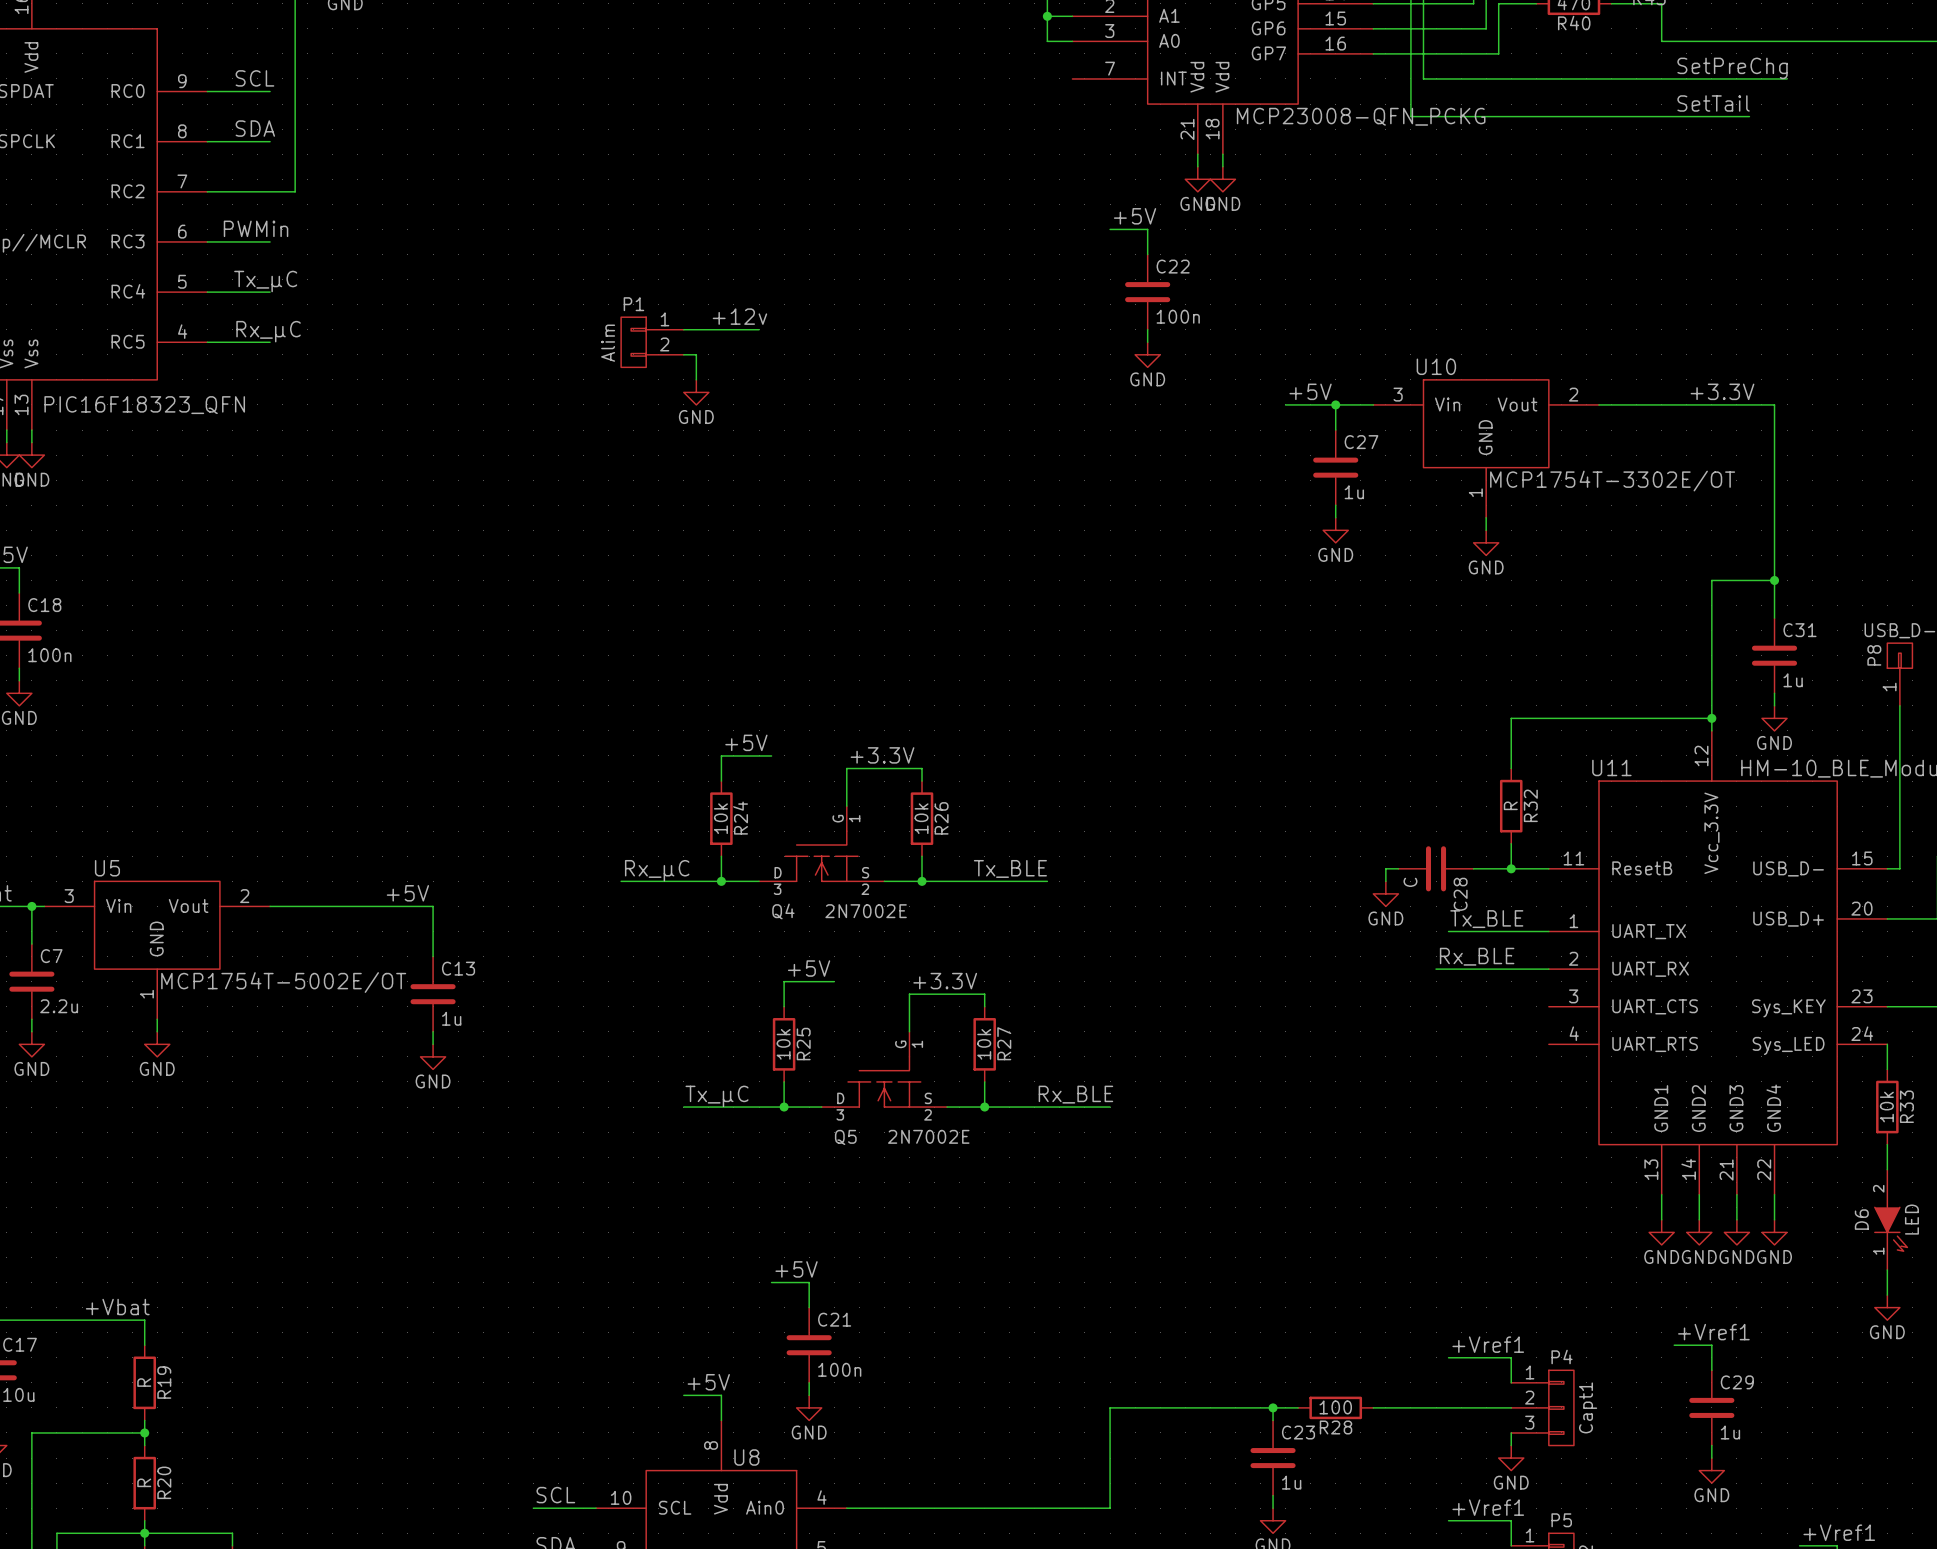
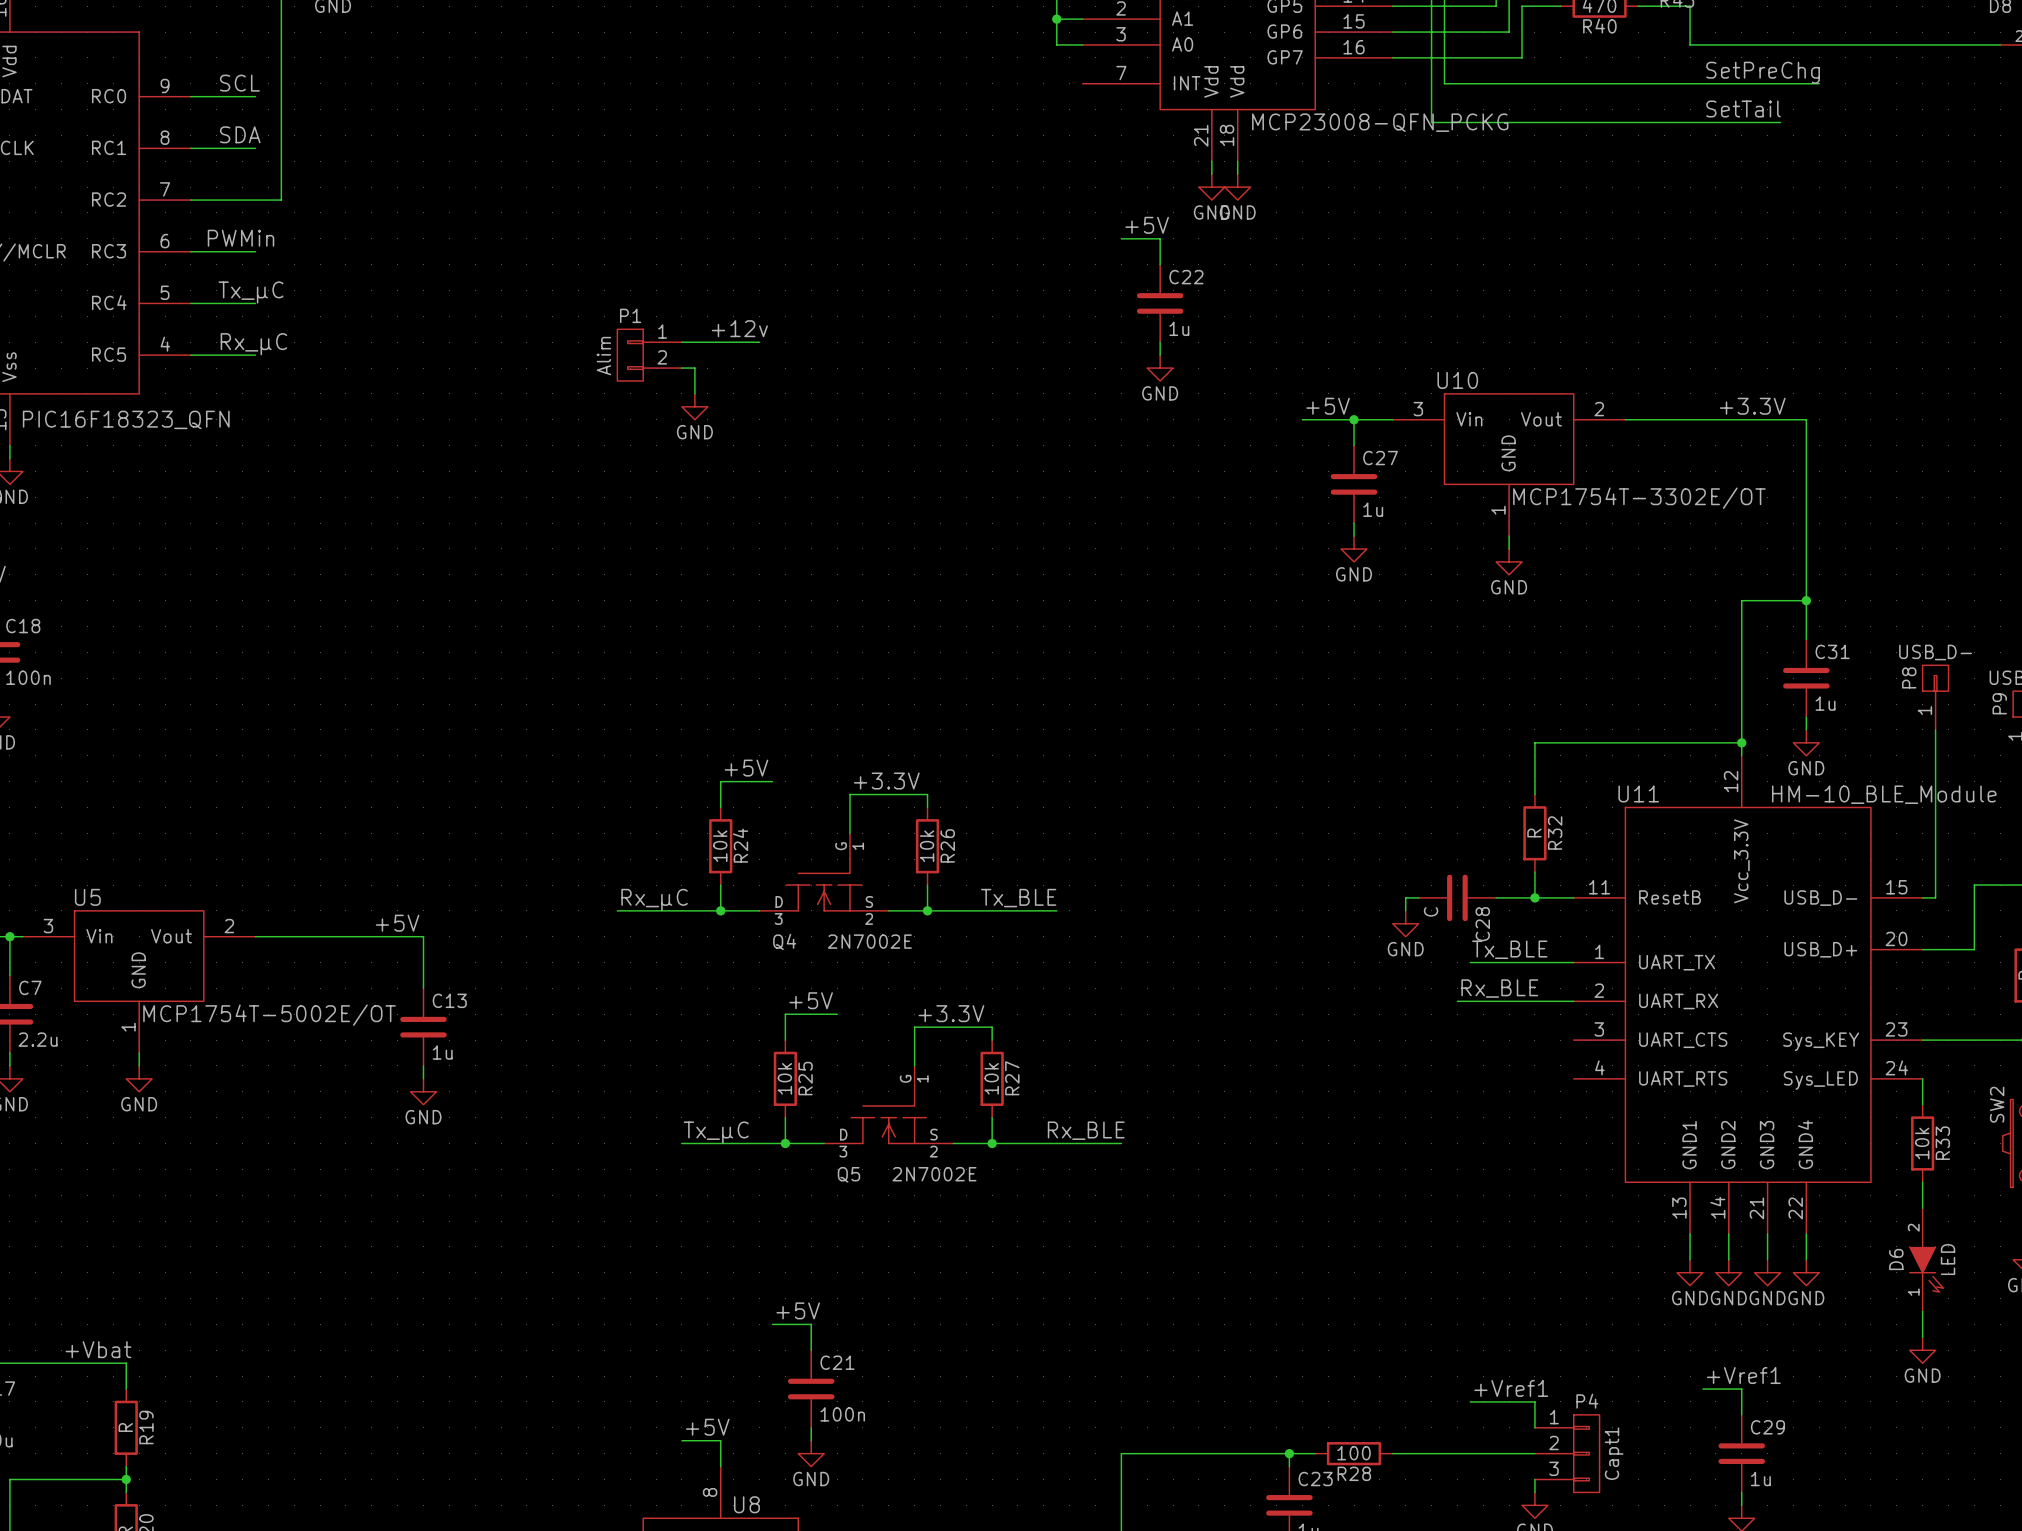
C22 value: 100n (1178, 316) -> 1u (1179, 328)

